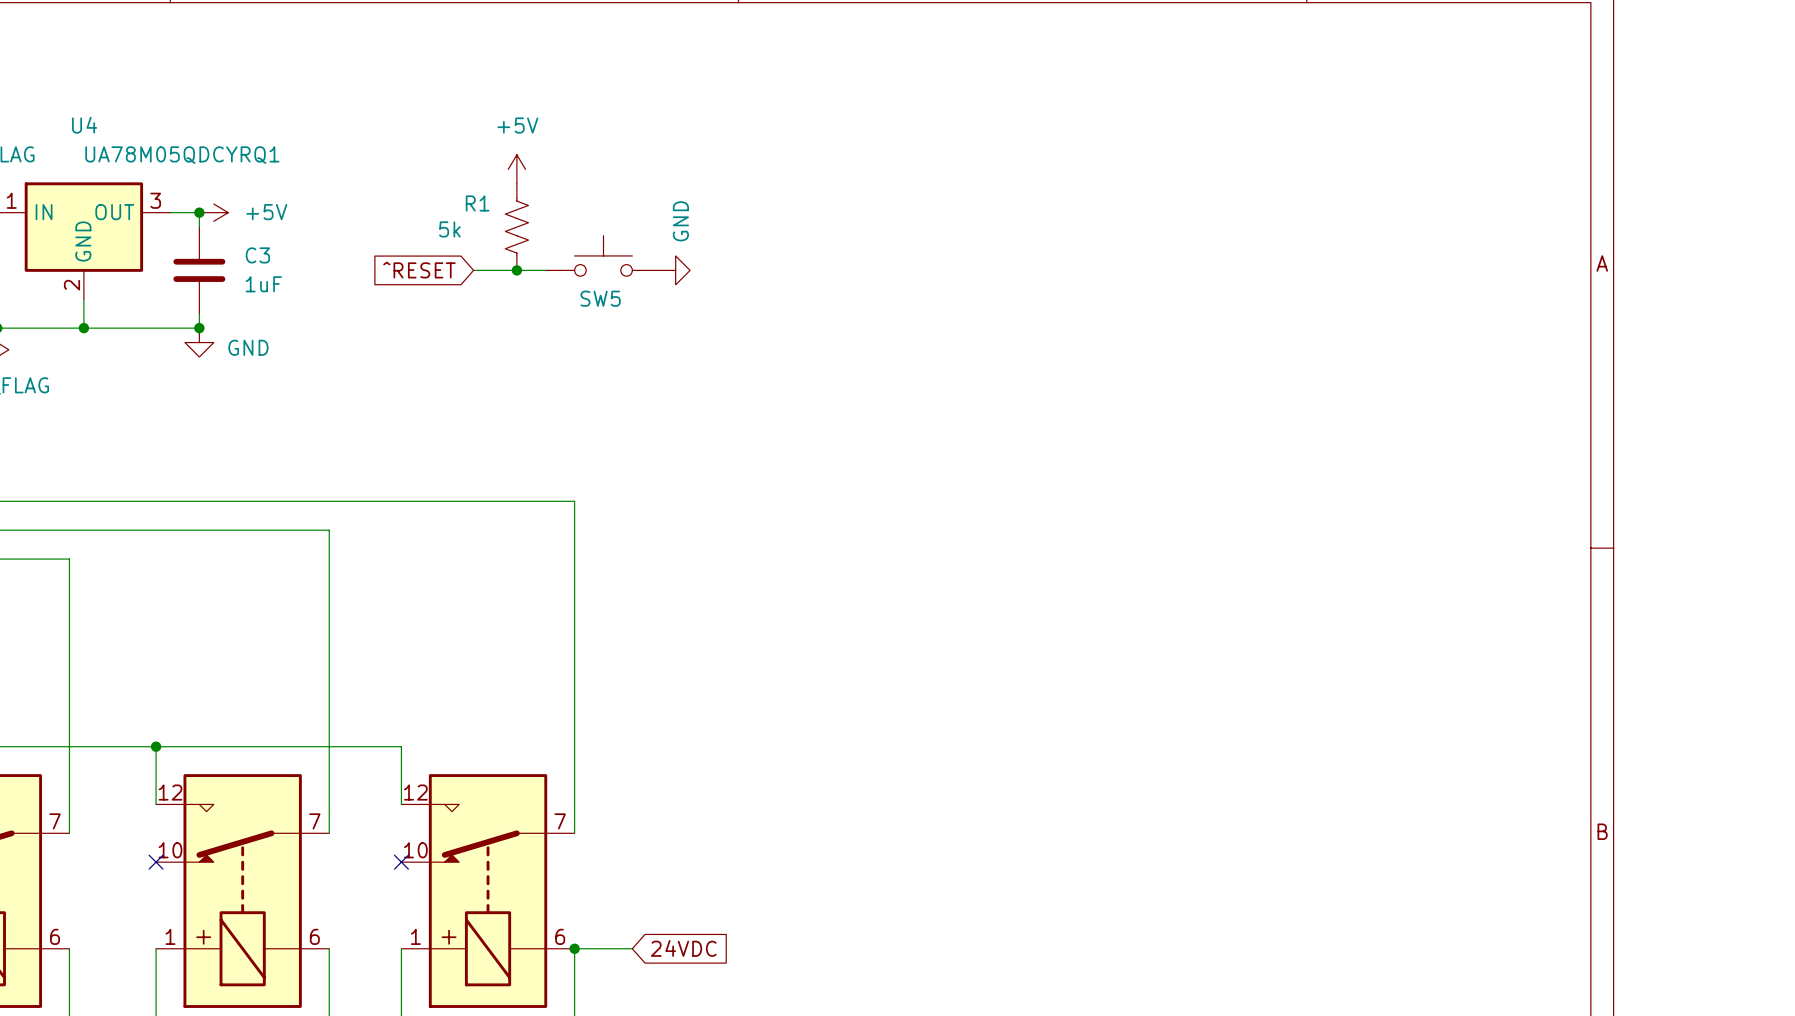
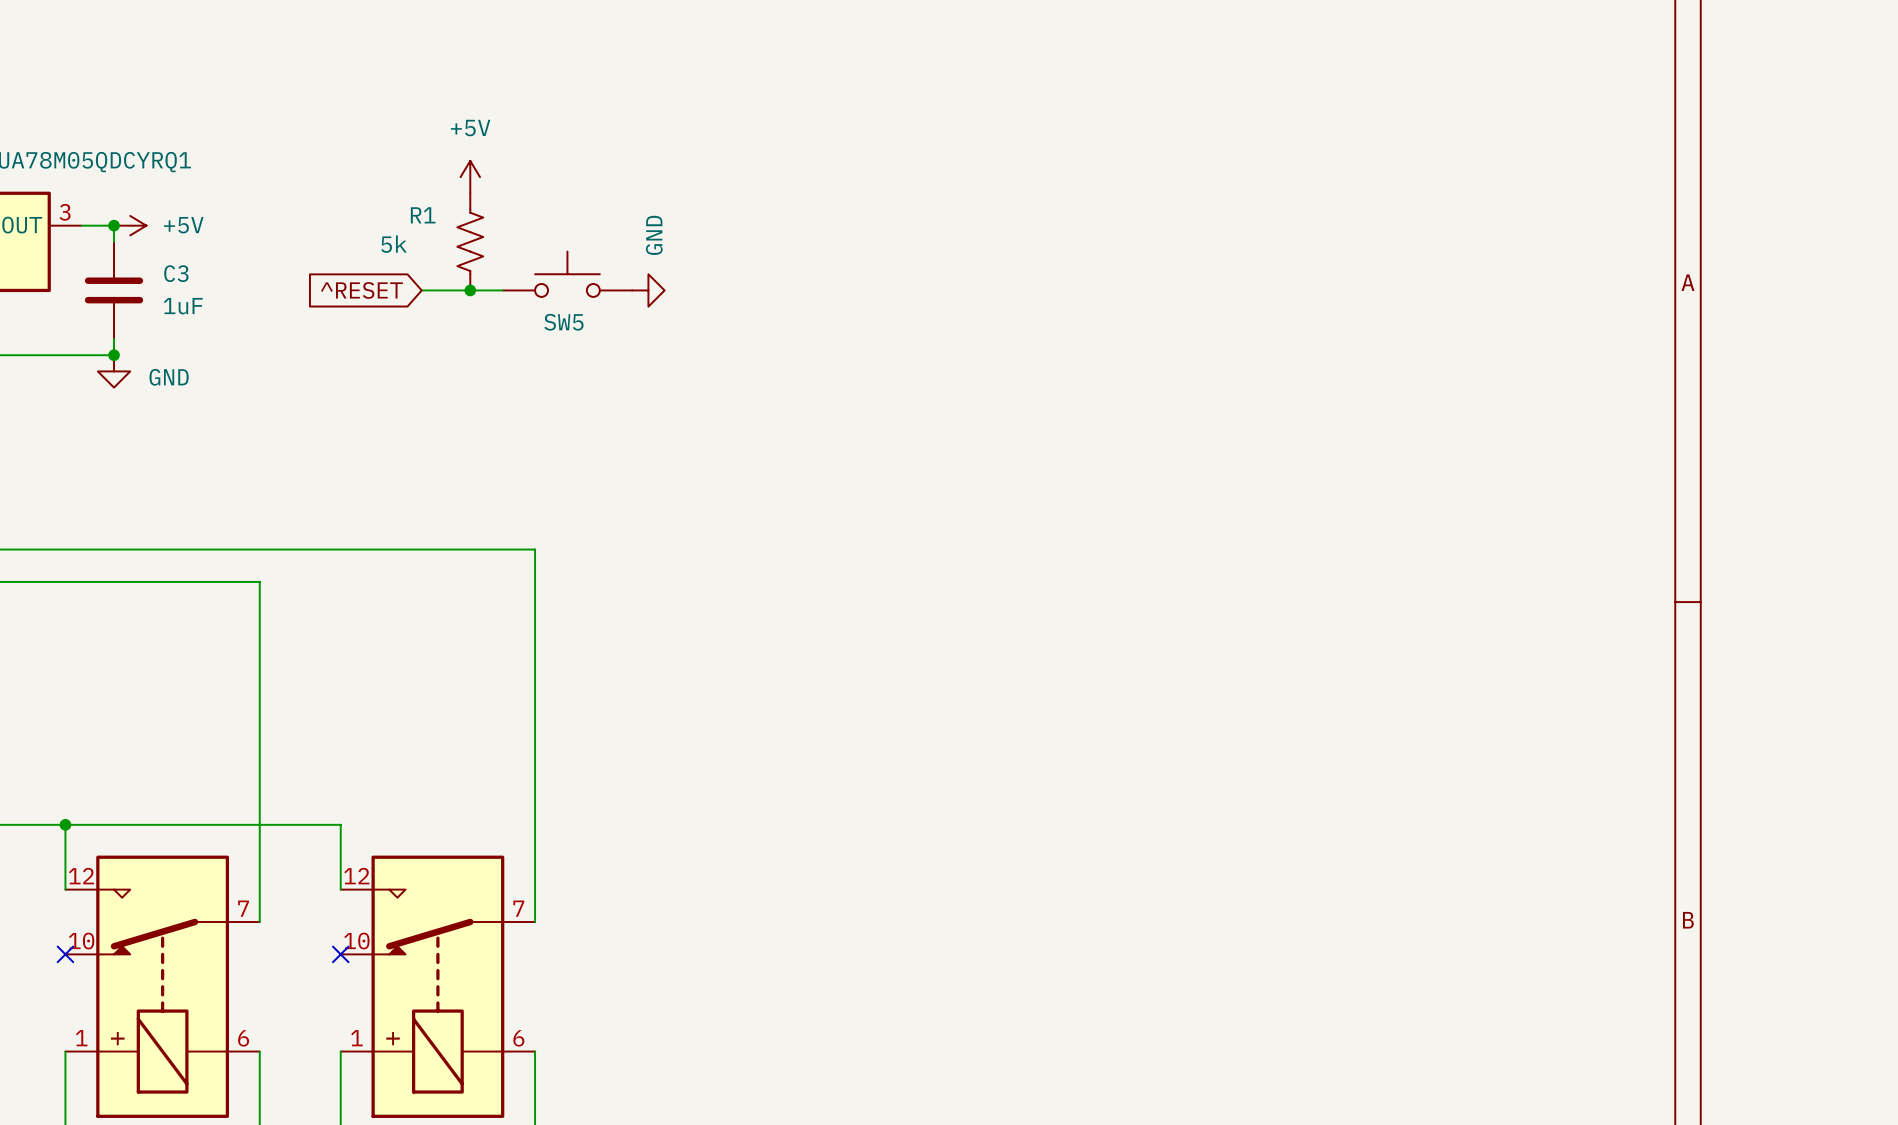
wire: (574, 948) (632, 948) -> none
junction: (574, 948) -> none
global label: 24VDC (683, 948) -> none

